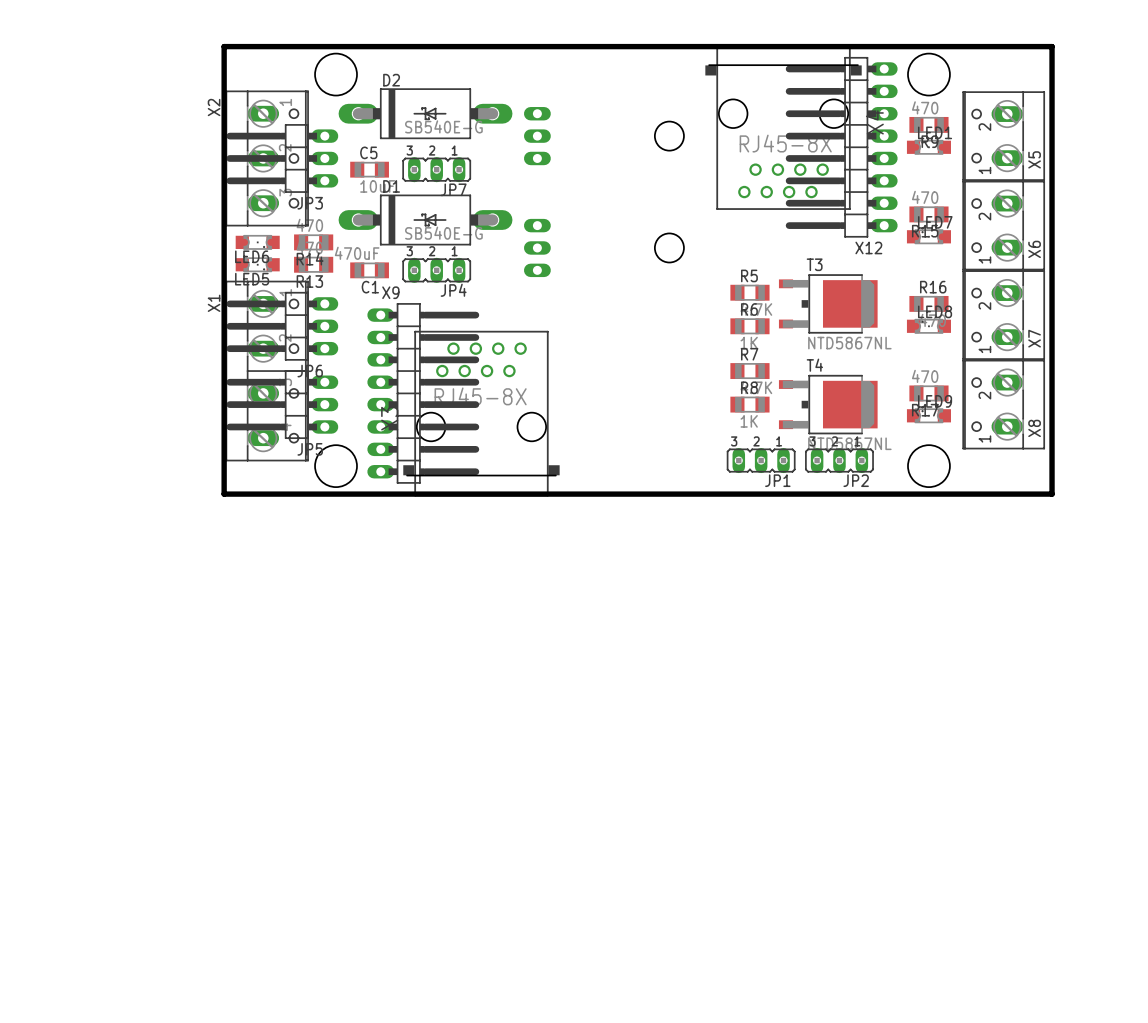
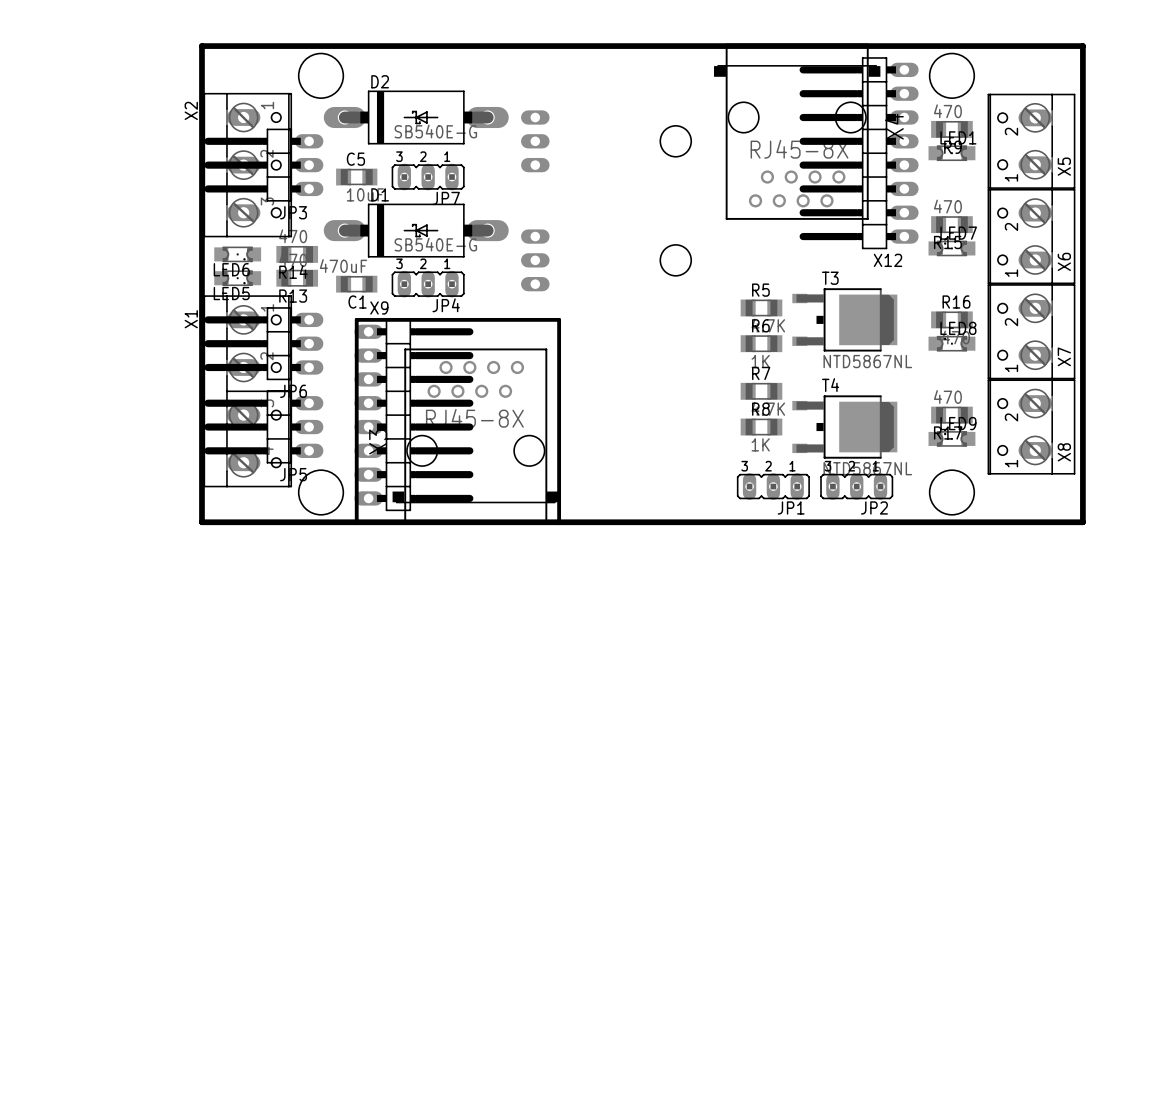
board edge: none -> (356, 522) (356, 319) (559, 319) (559, 522)

